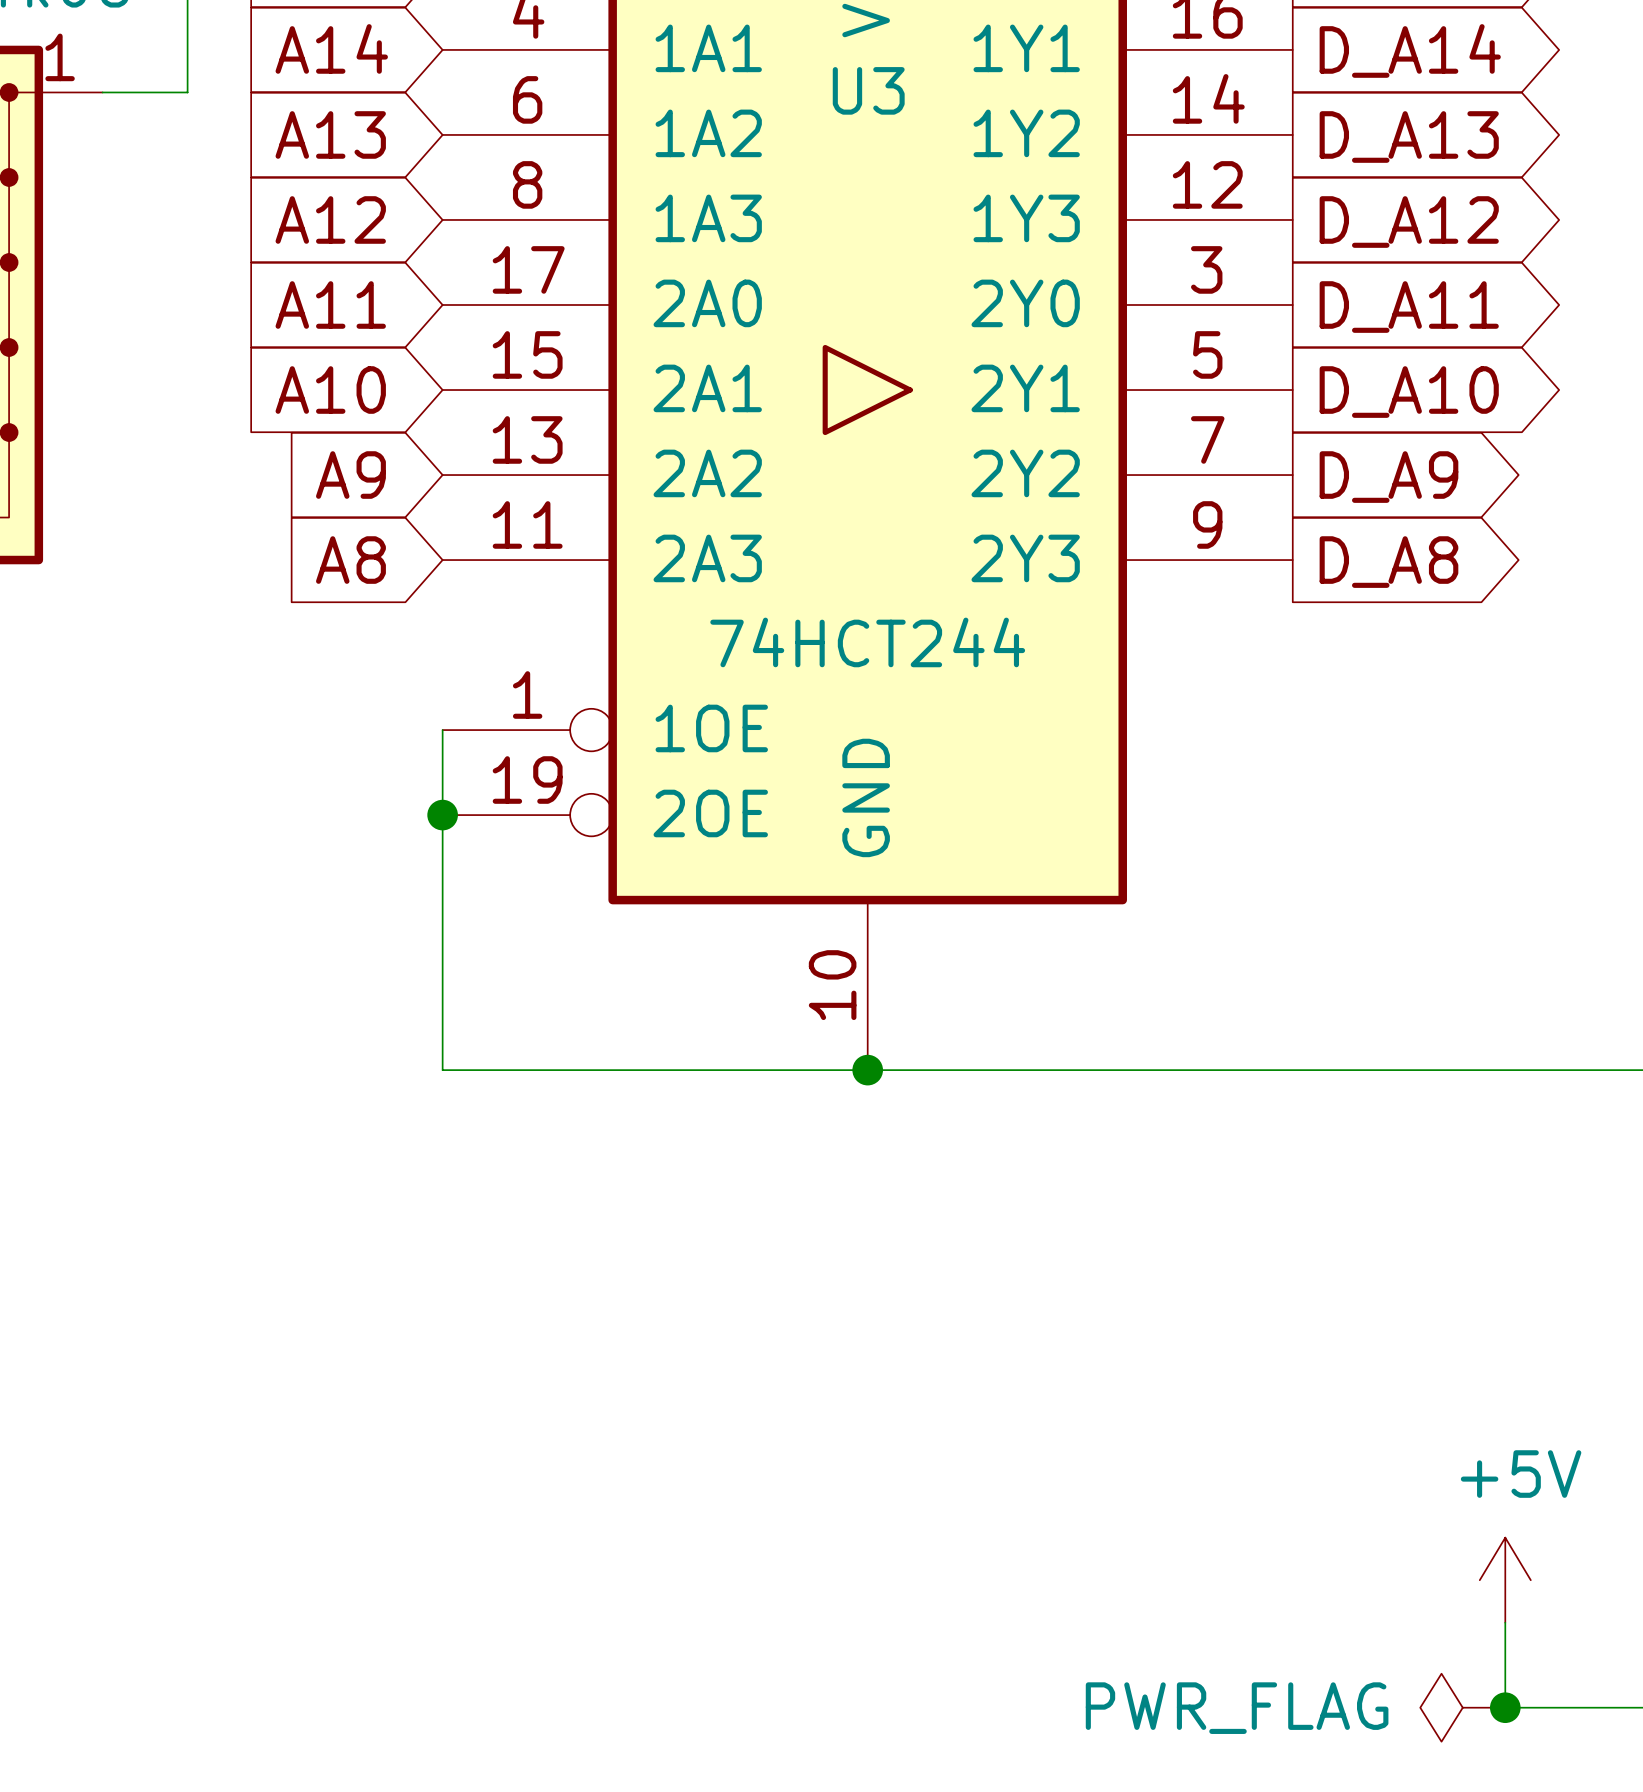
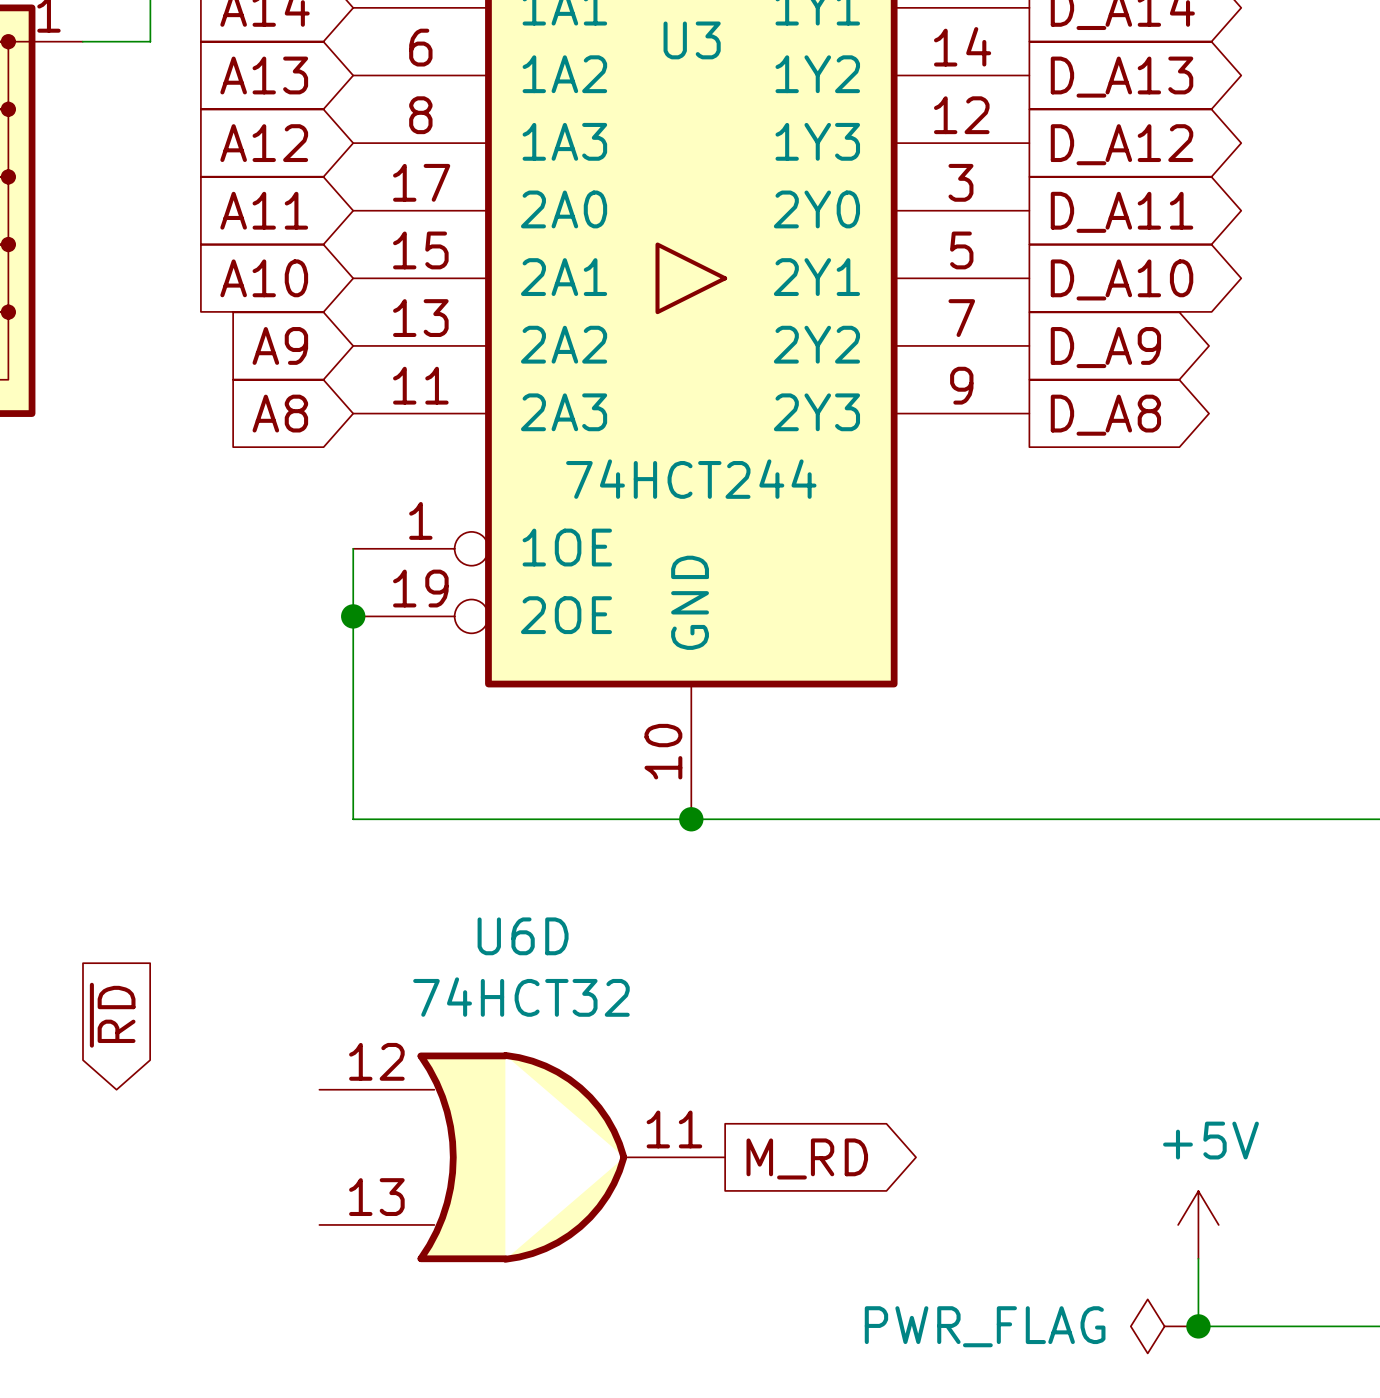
global label: none -> ~{RD} (112, 1015)
U6D: none -> 74HCT32 (522, 1157)
global label: none -> M_RD (807, 1158)

